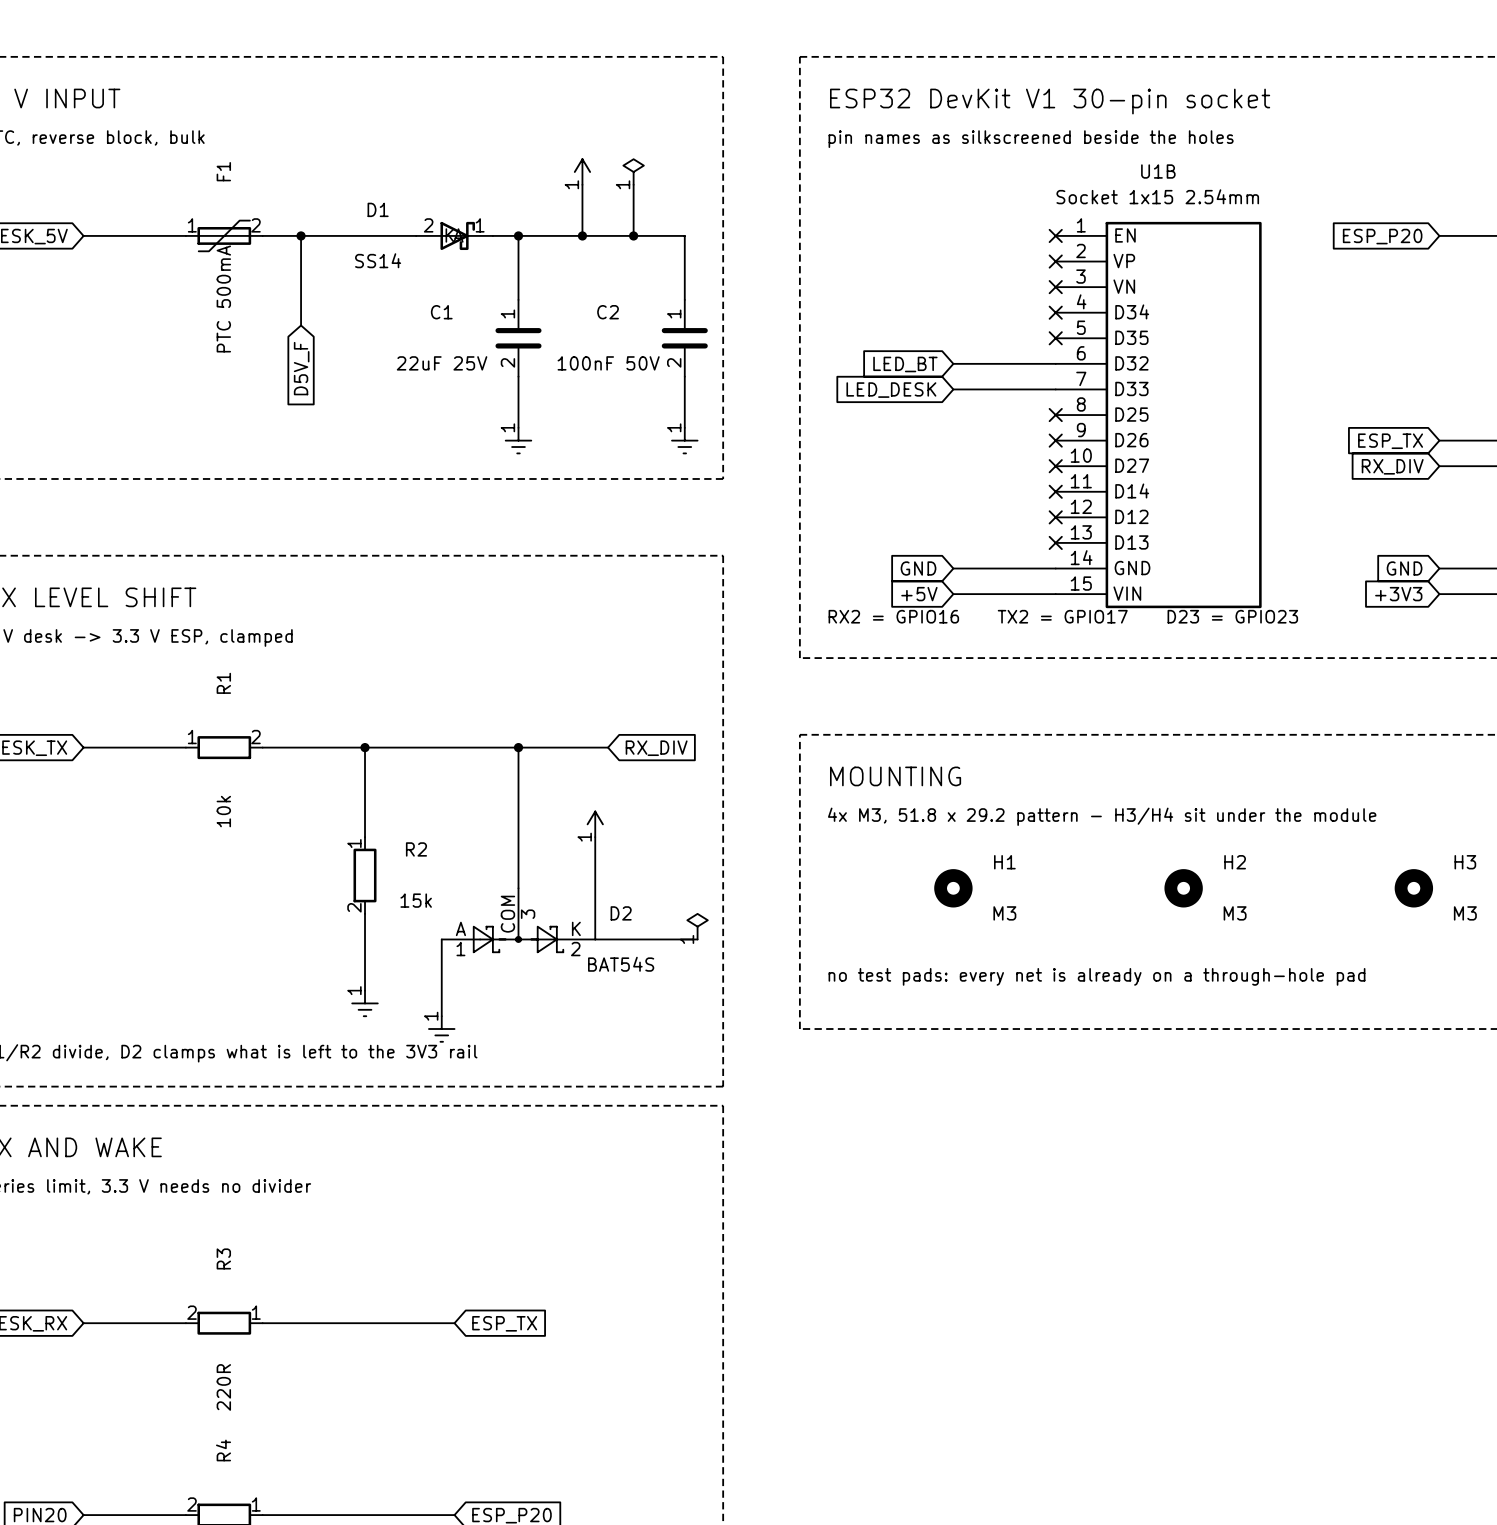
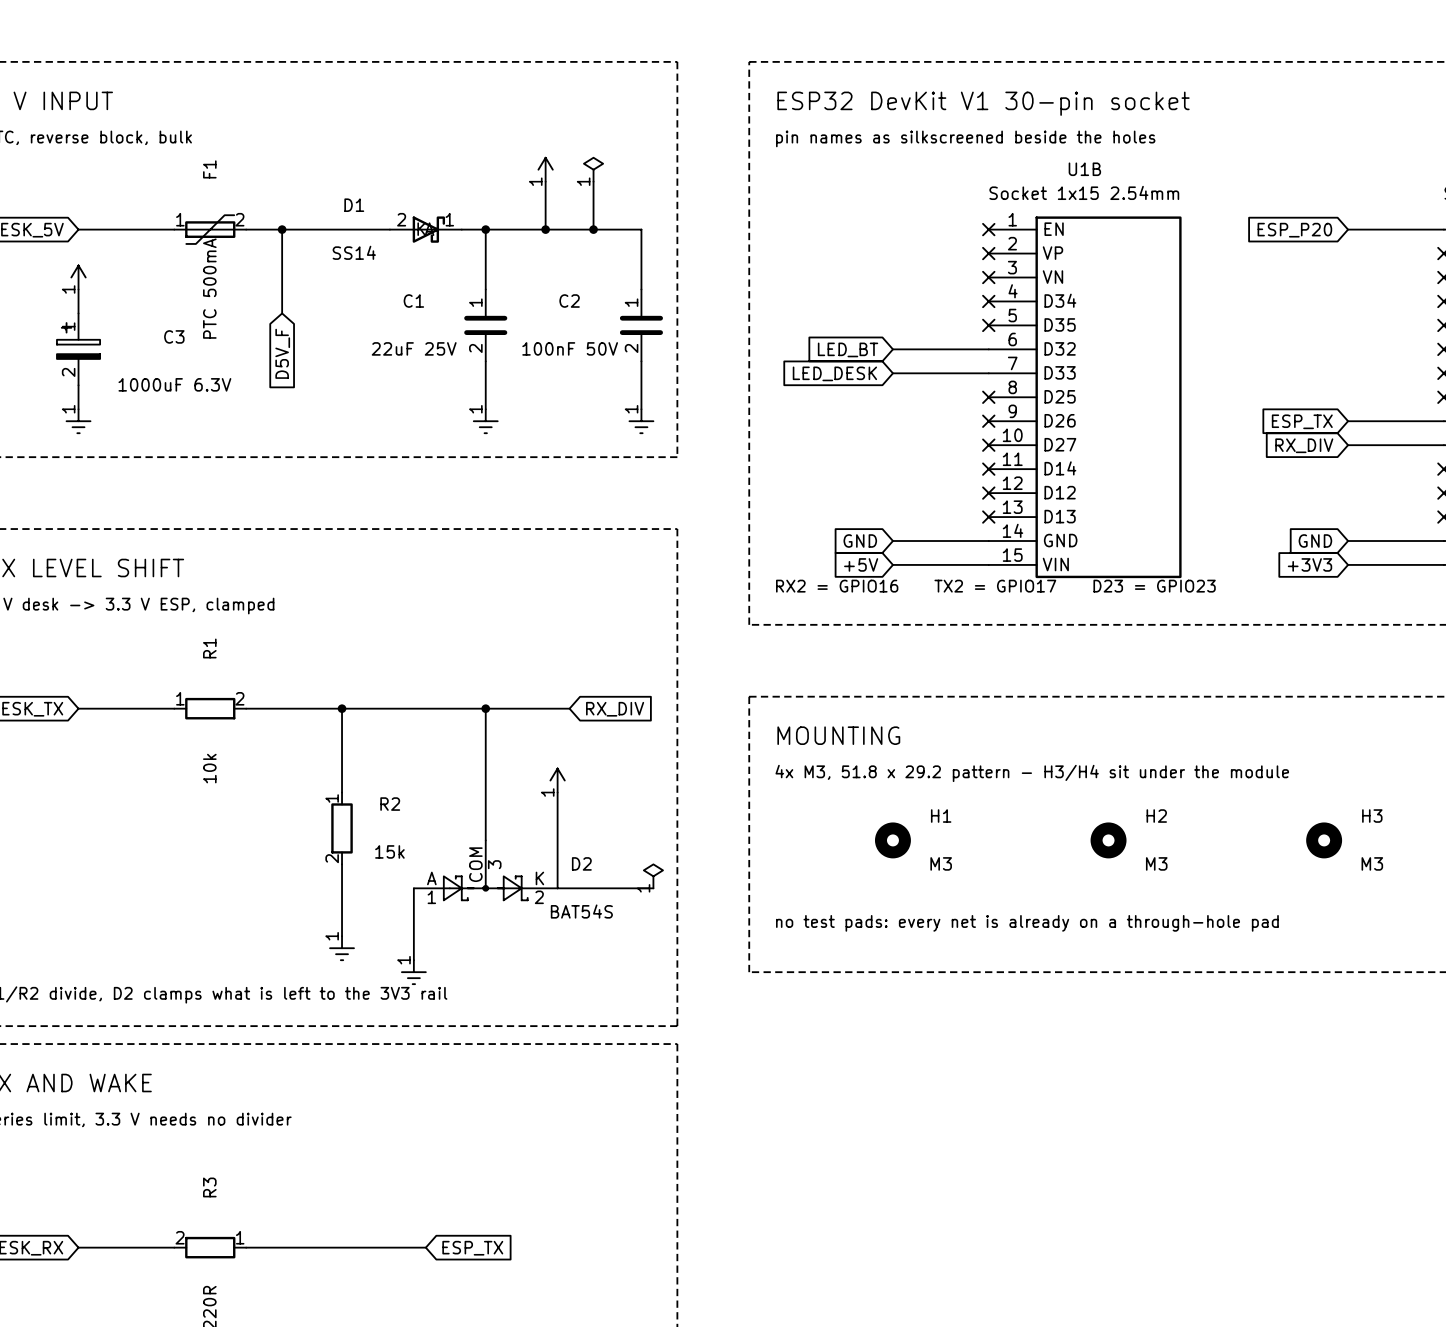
power symbol: none -> (78, 277)
wire: none -> (78, 289) (78, 313)
C3: none -> 1000uF 6.3V (78, 349)
wire: none -> (78, 385) (78, 409)
power symbol: none -> (78, 421)

